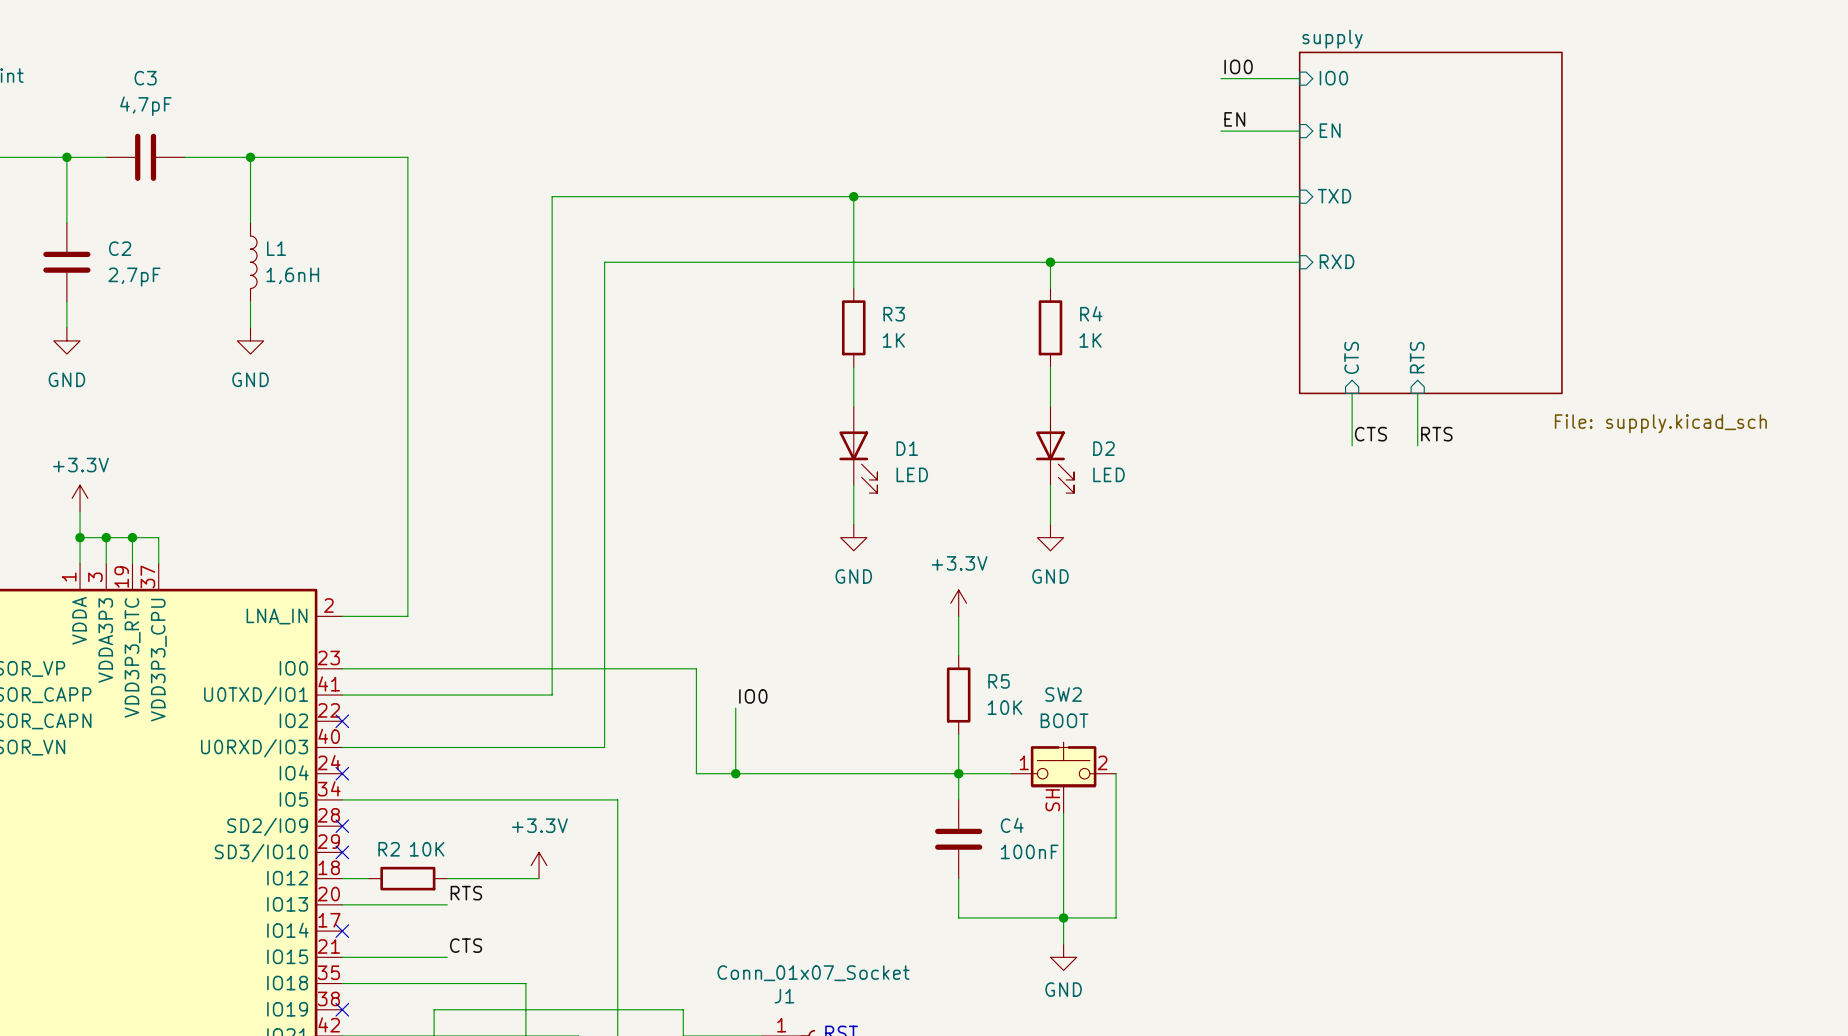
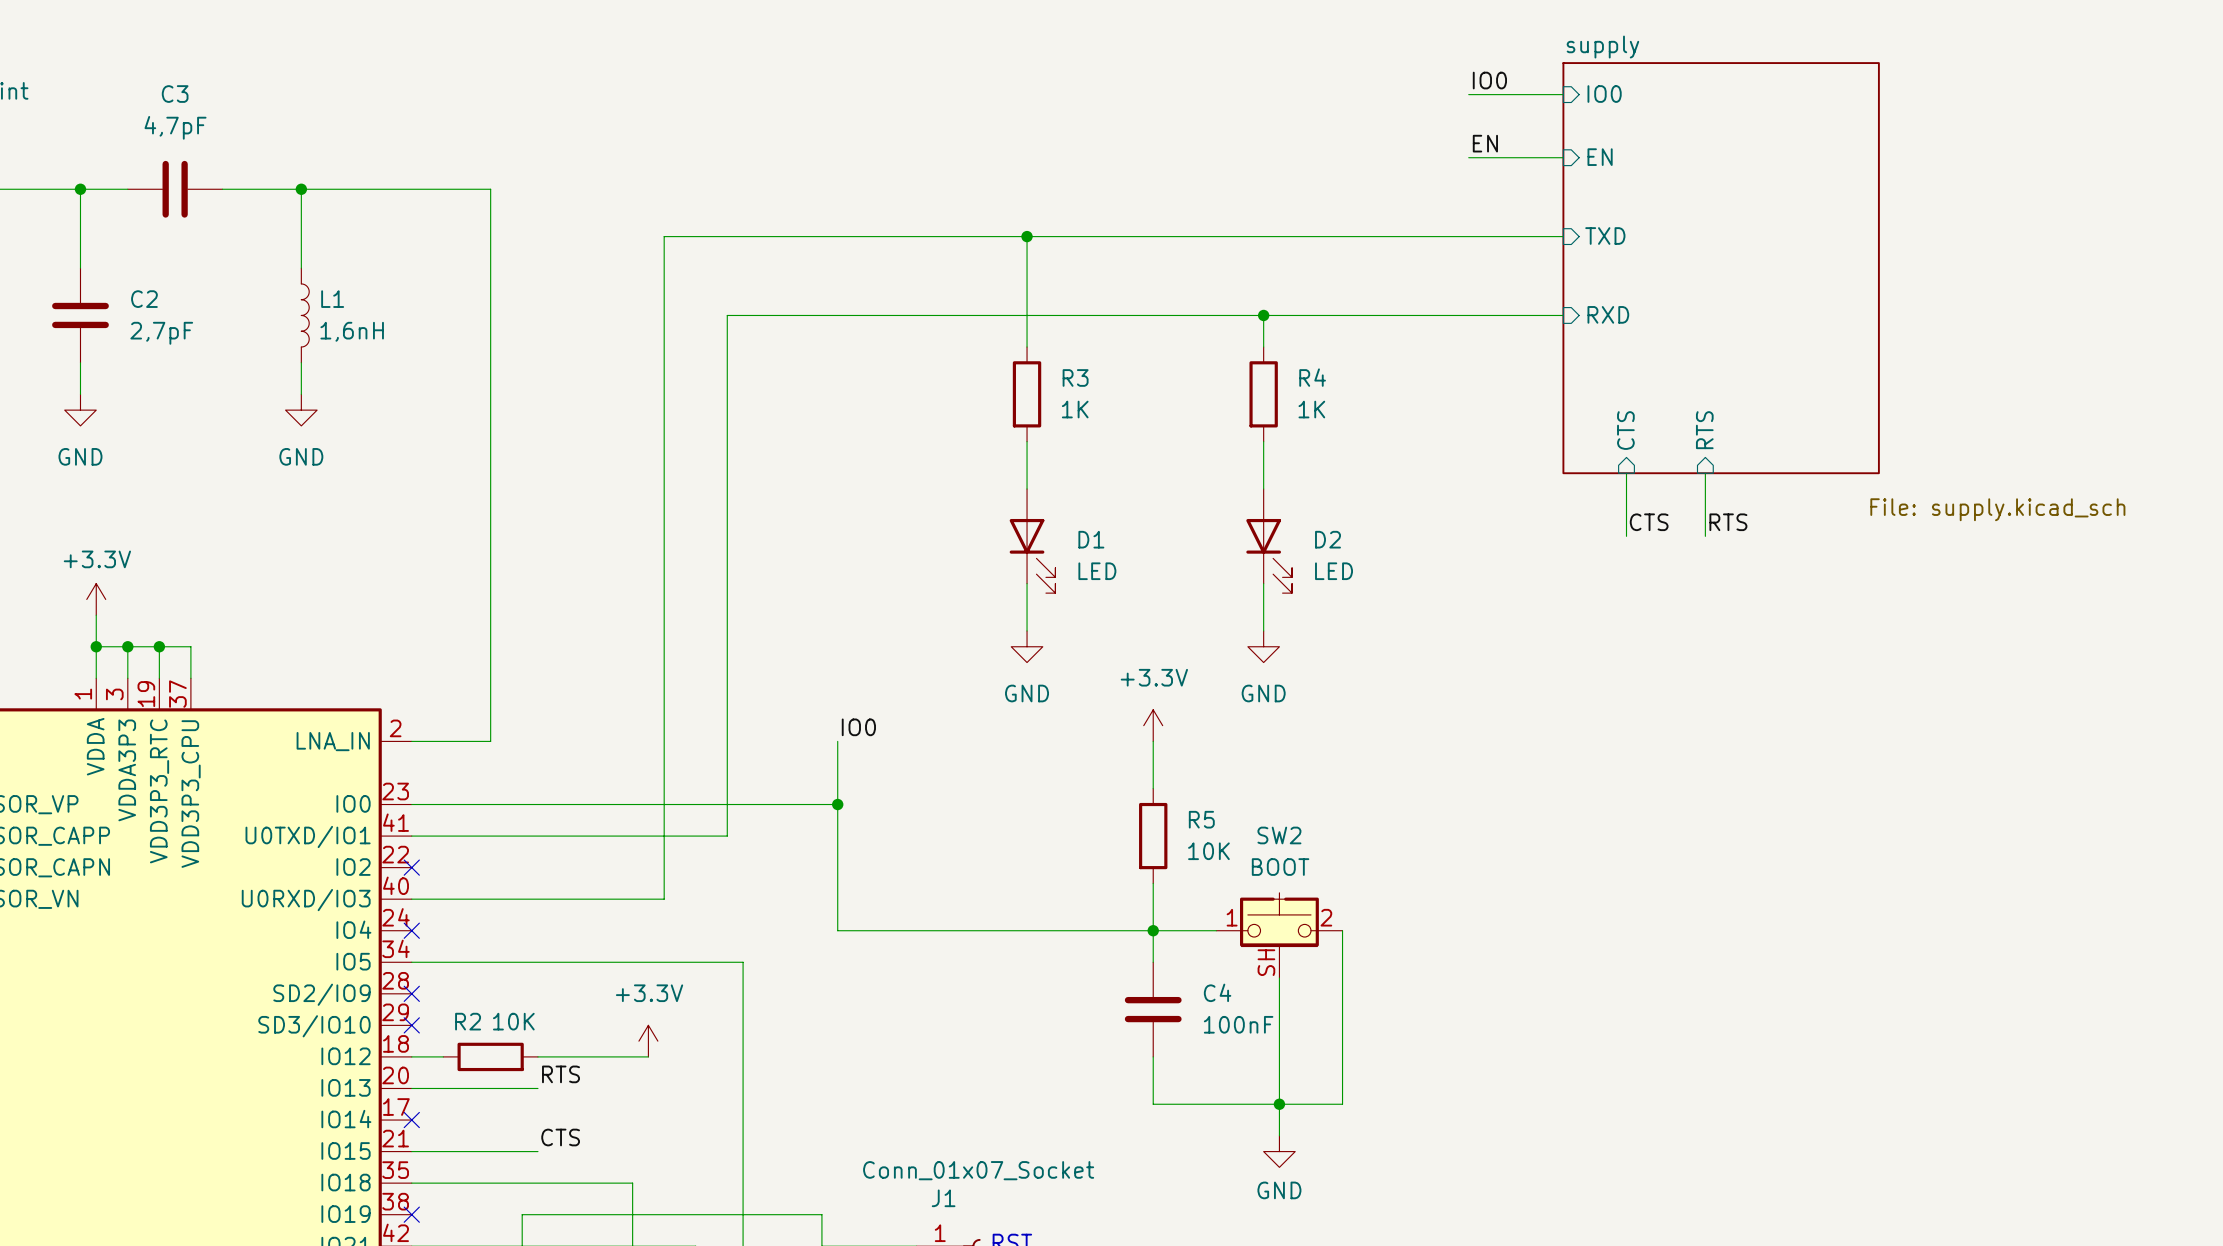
wire: none -> (837, 741) (837, 804)
junction: none -> (837, 804)
wire: (604, 695) (604, 747) (552, 747) -> (727, 836) (664, 836) (664, 899)
label position: IO0 (753, 696) -> IO0 (858, 727)
wire: (735, 708) (735, 773) -> none
junction: (735, 773) -> none

